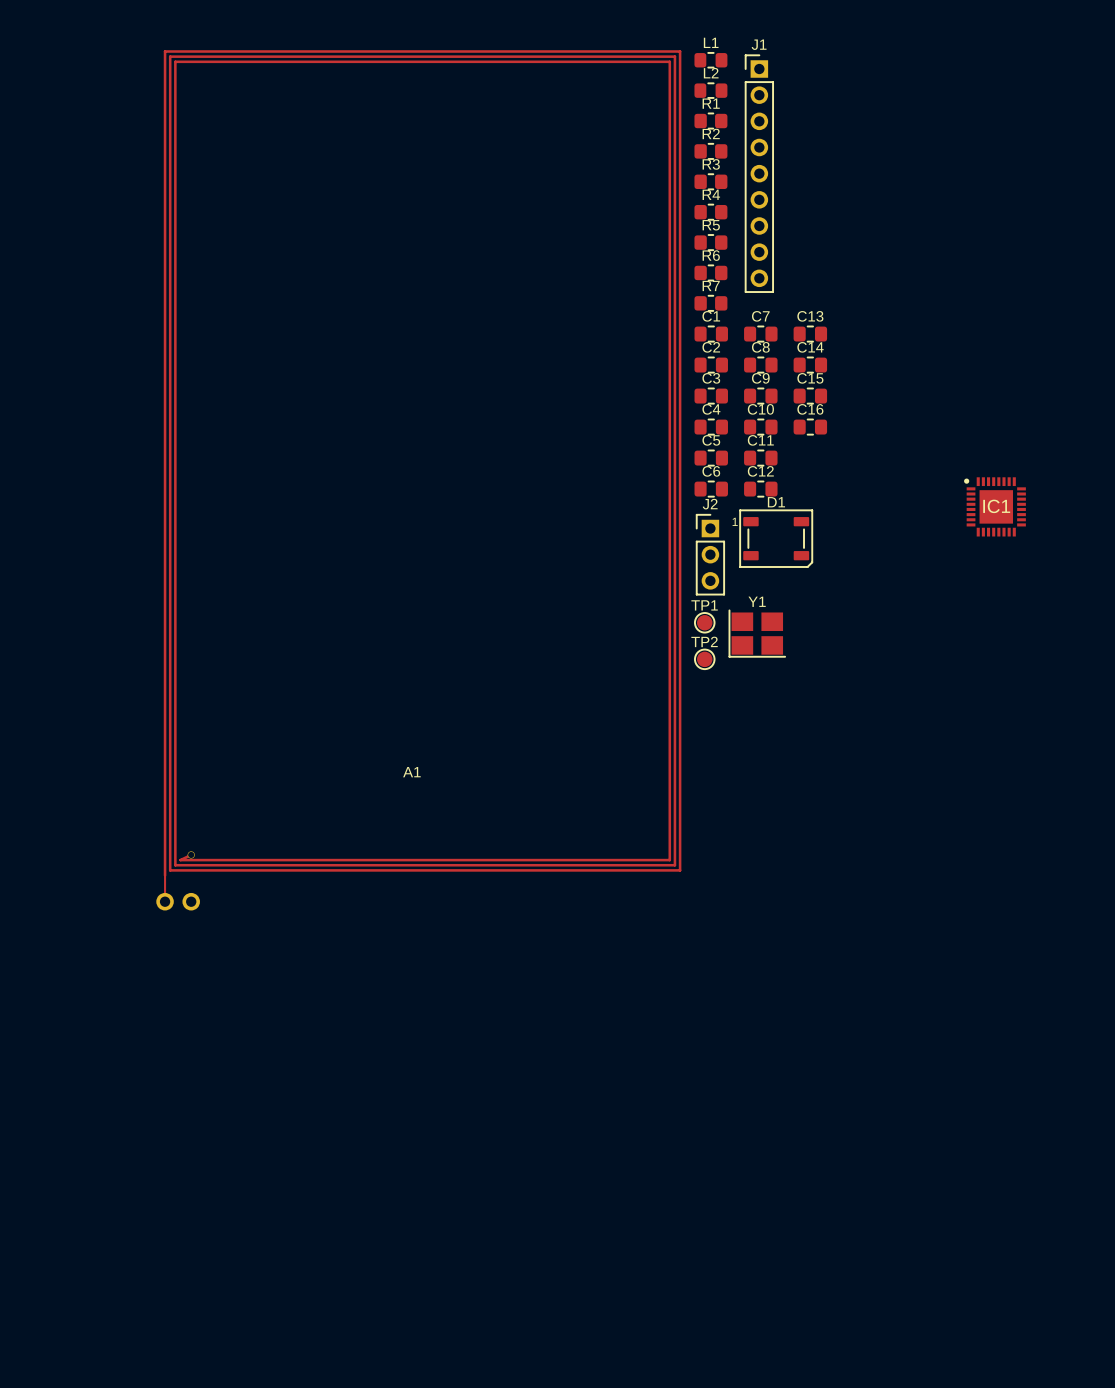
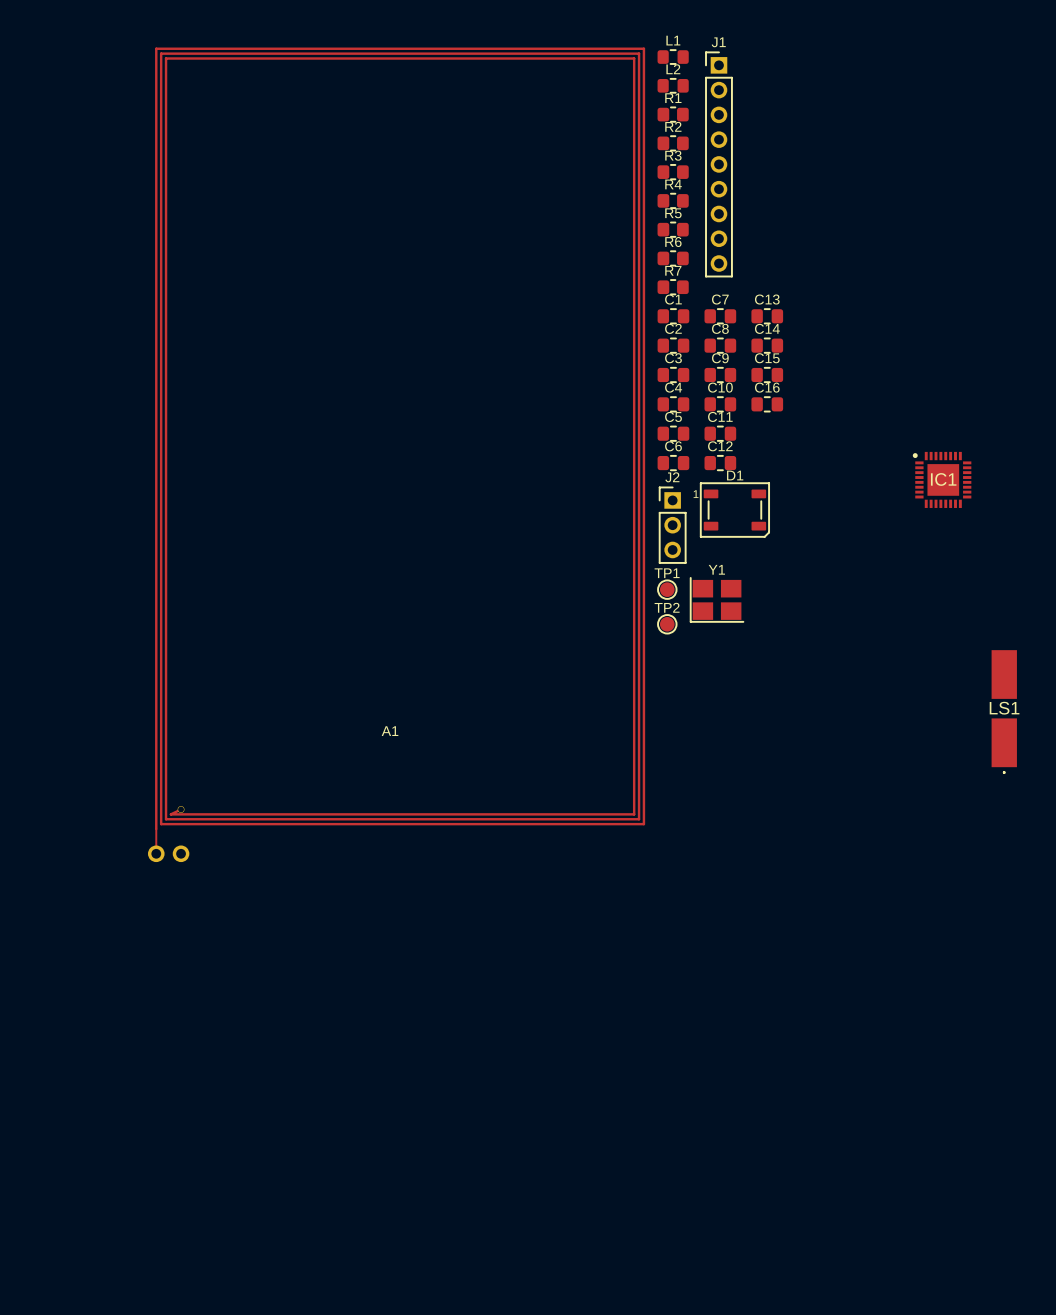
LS1: none -> (1004, 711)

